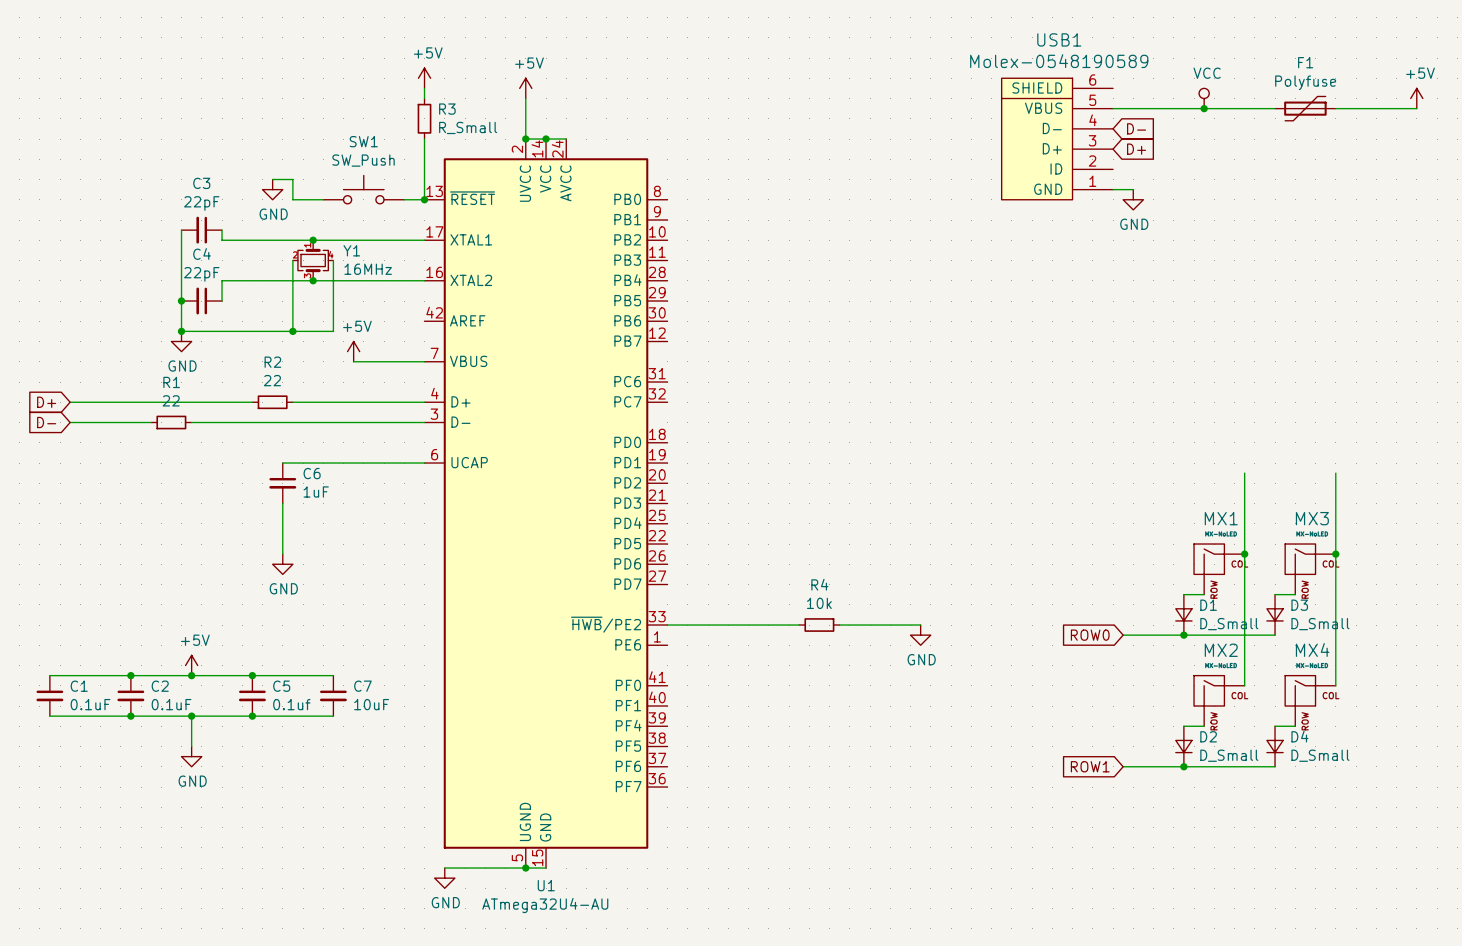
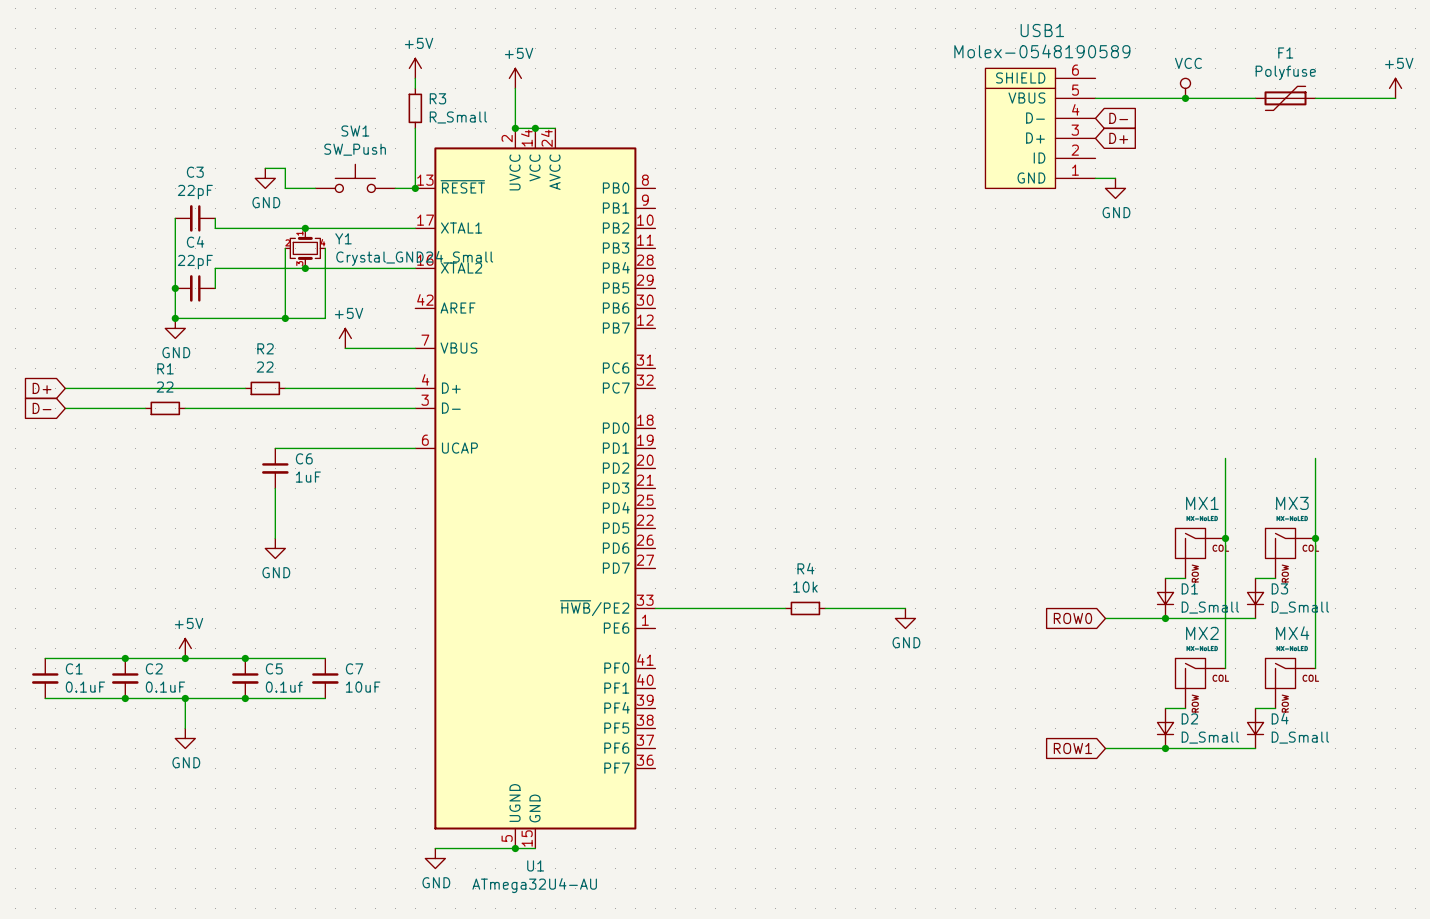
Y1 value: 16MHz (368, 269) -> Crystal_GND24_Small (414, 258)

